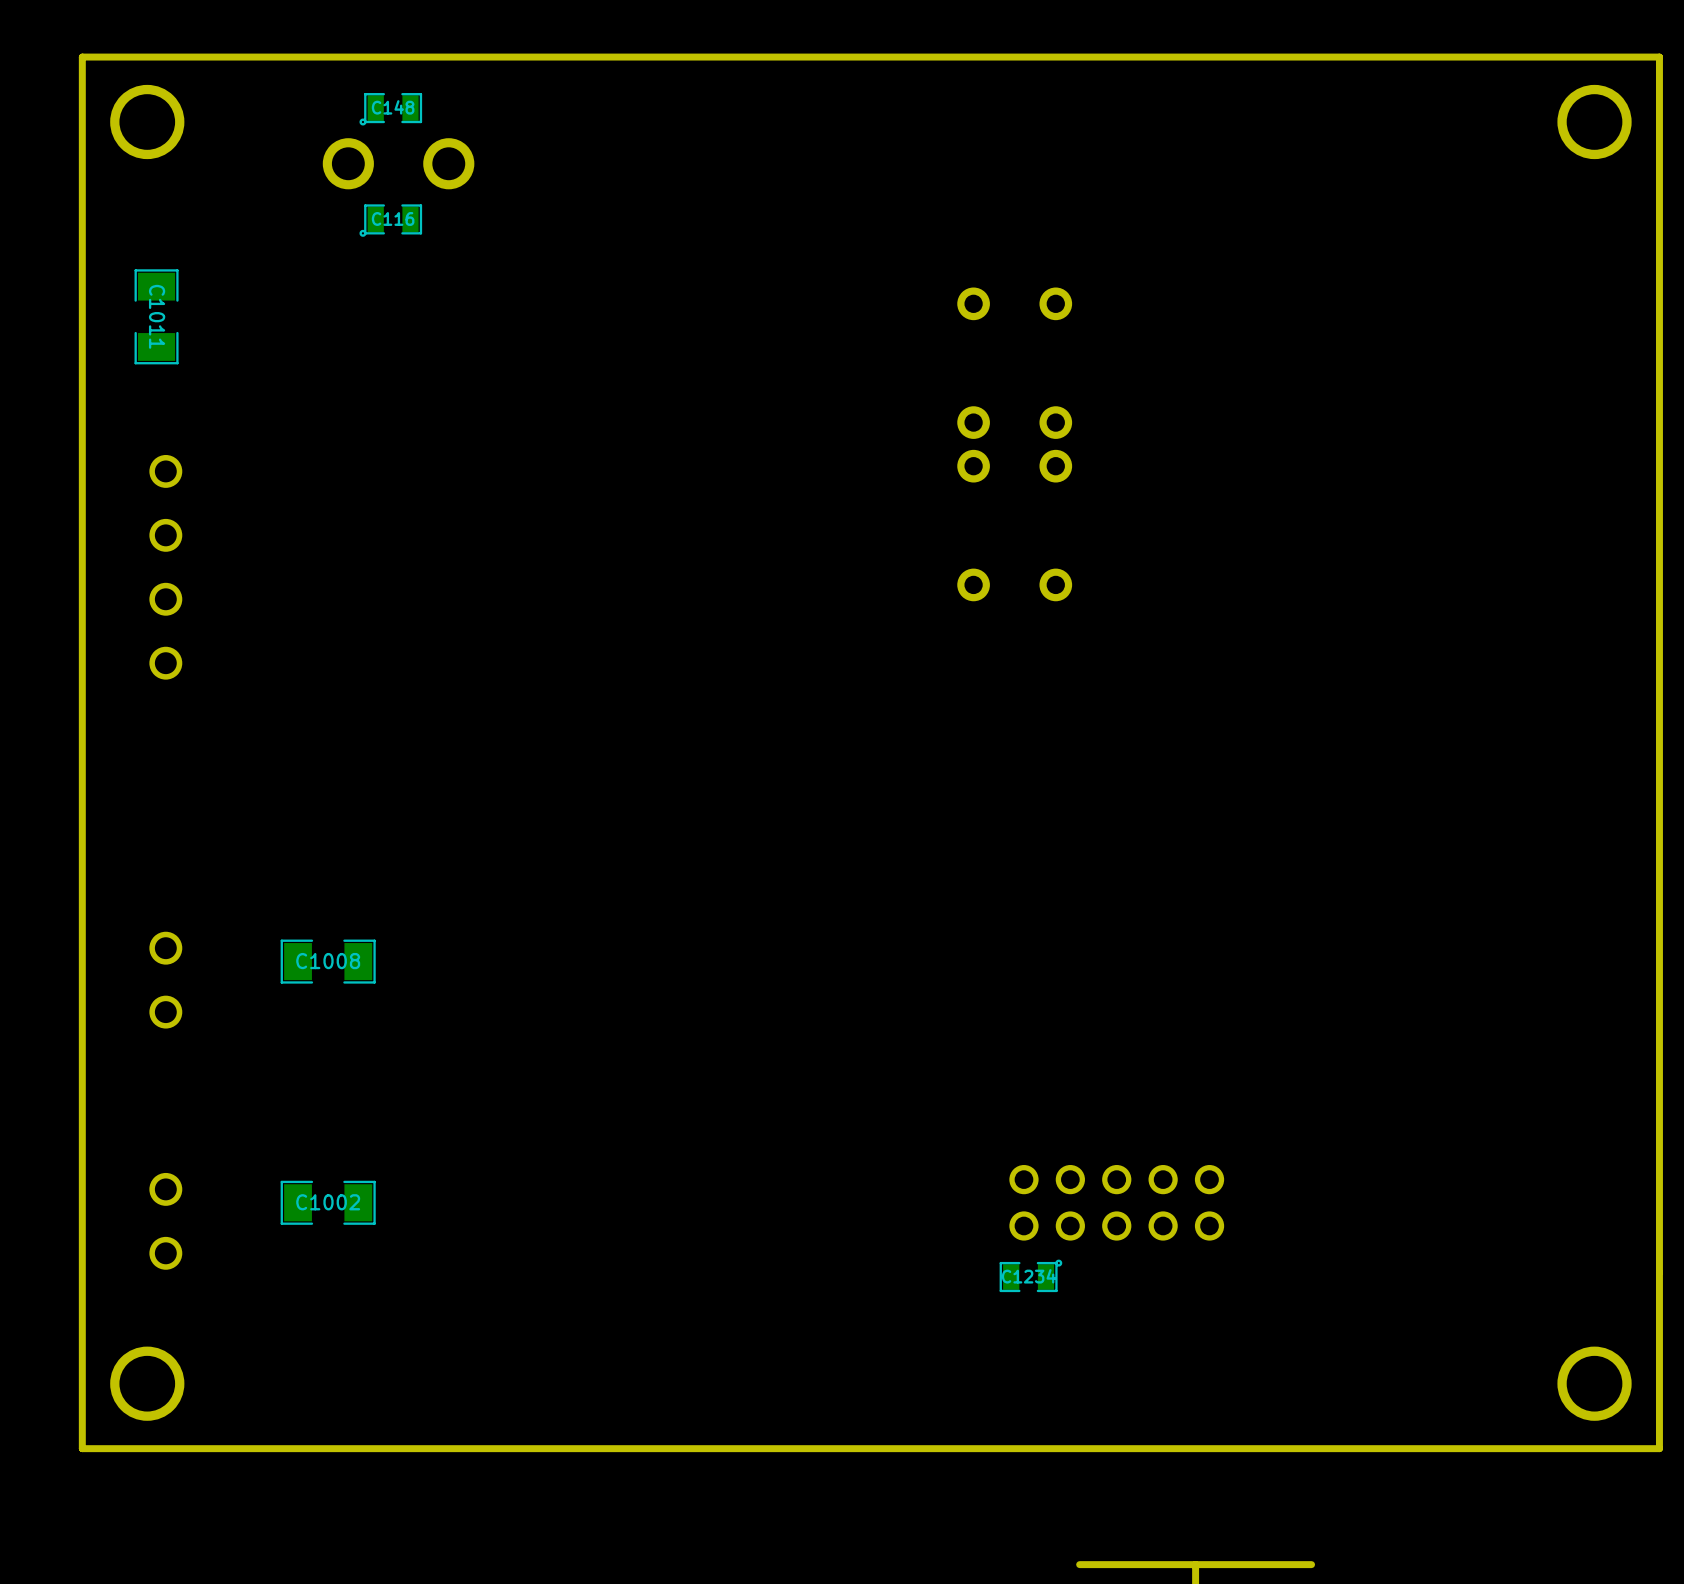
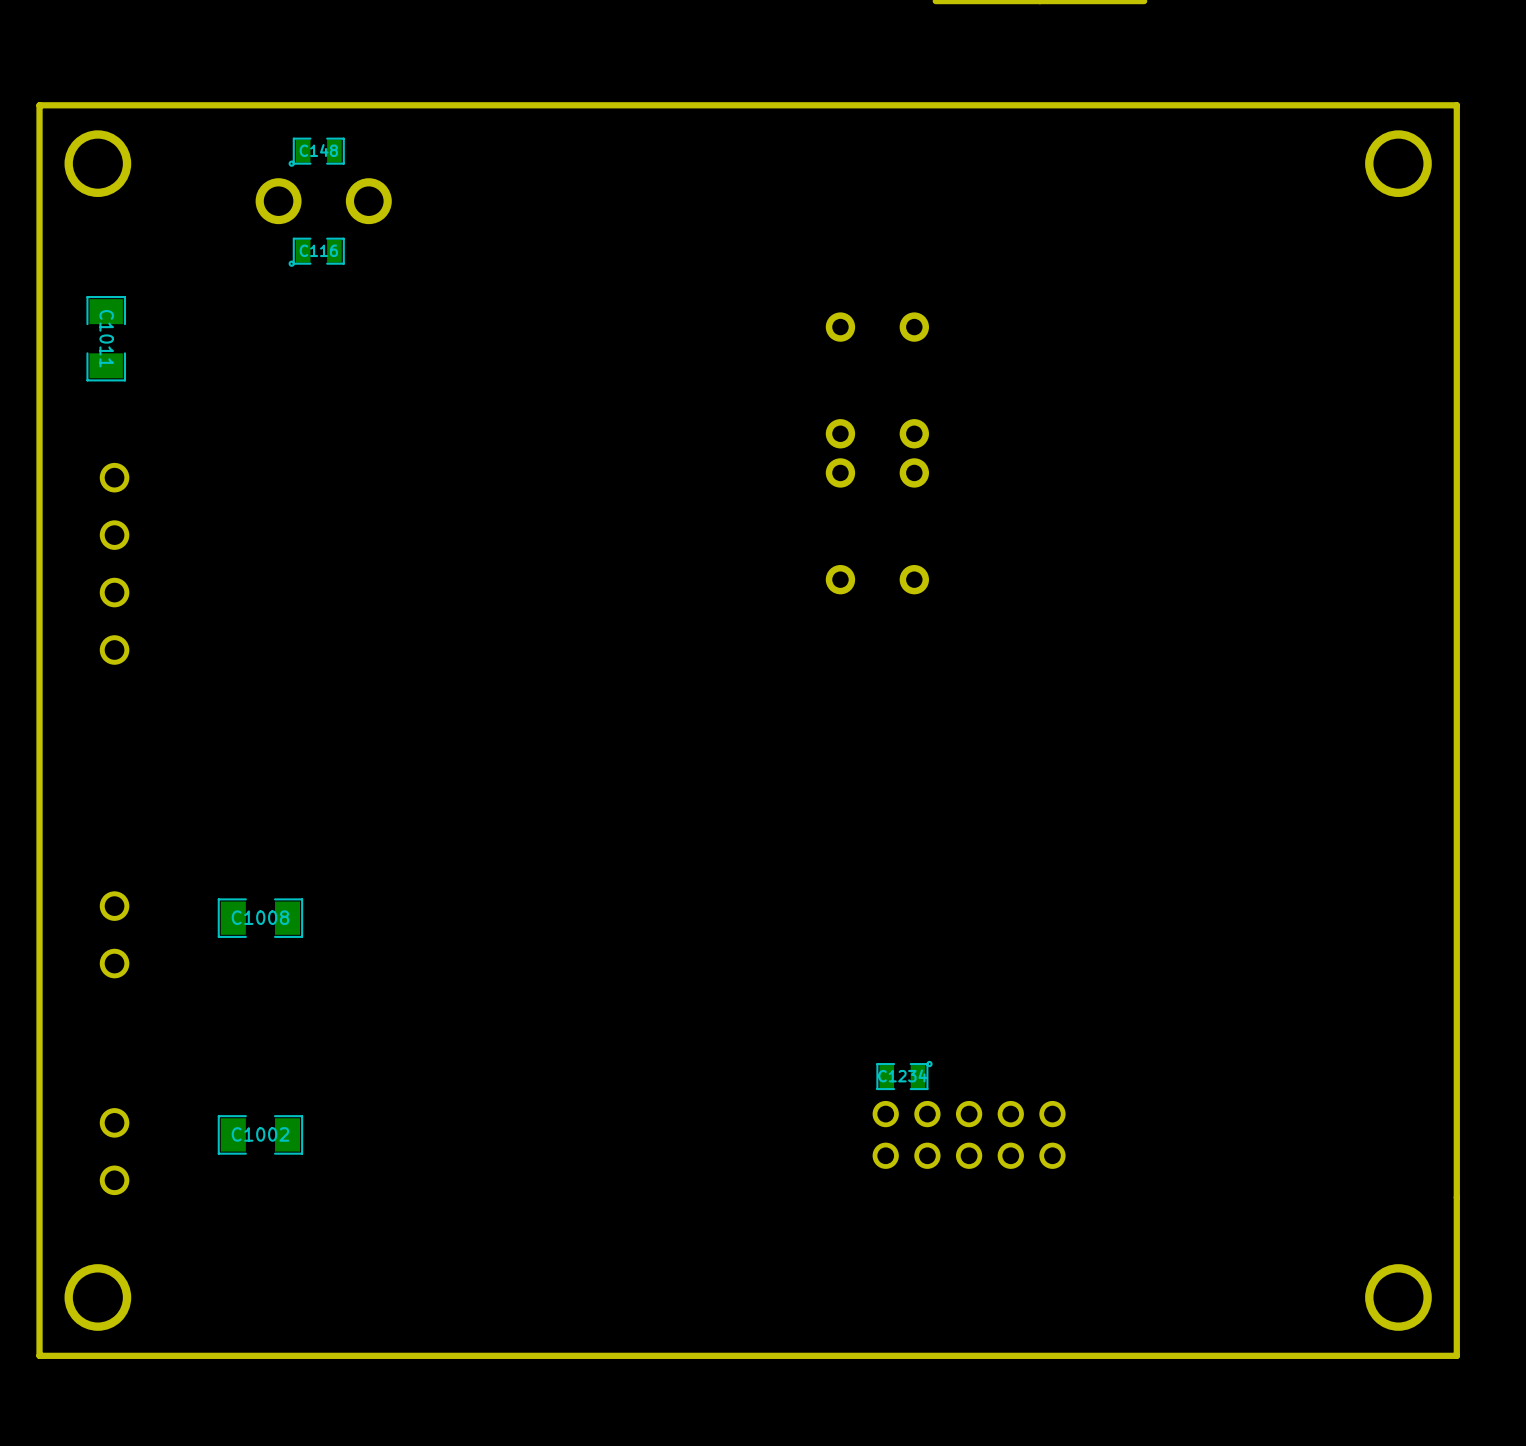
C1234 position: (1030, 1275) -> (904, 1075)

